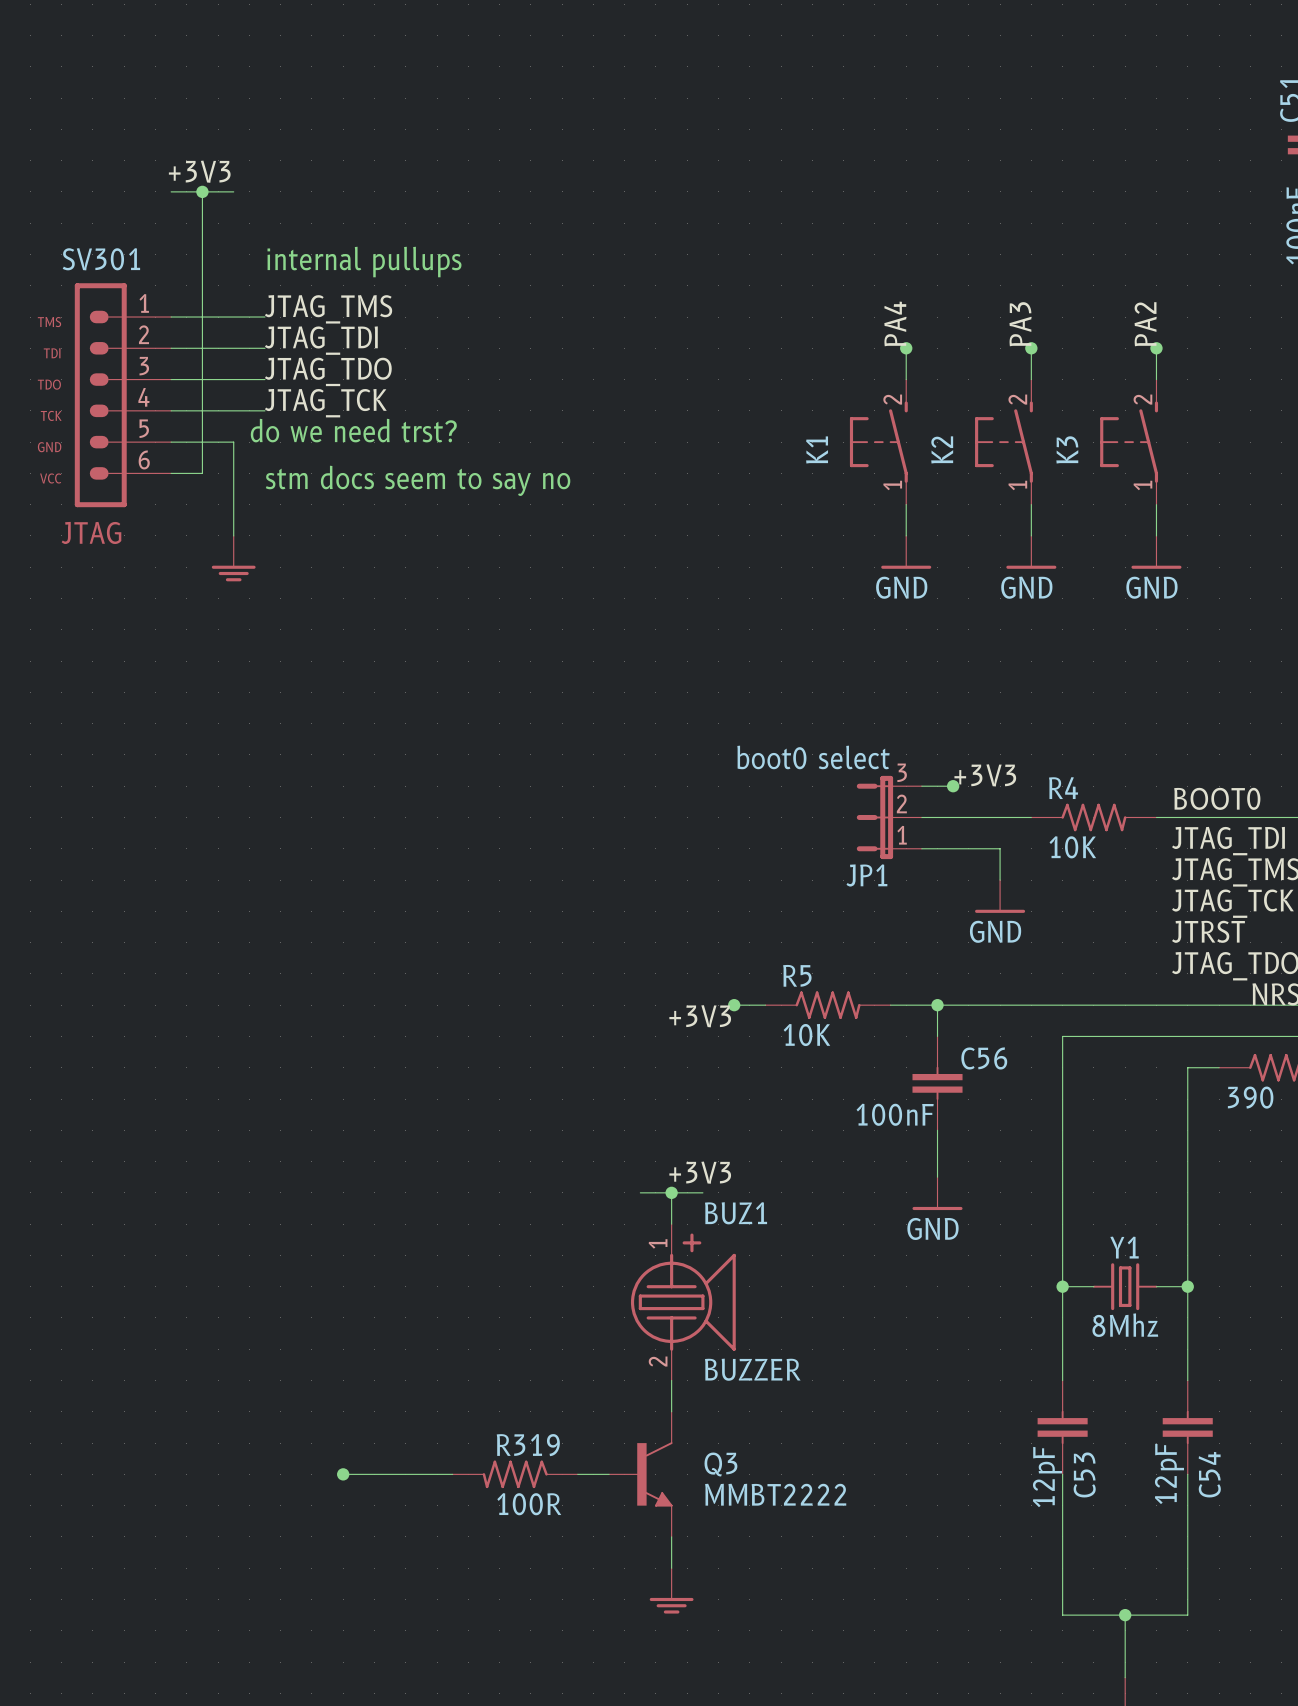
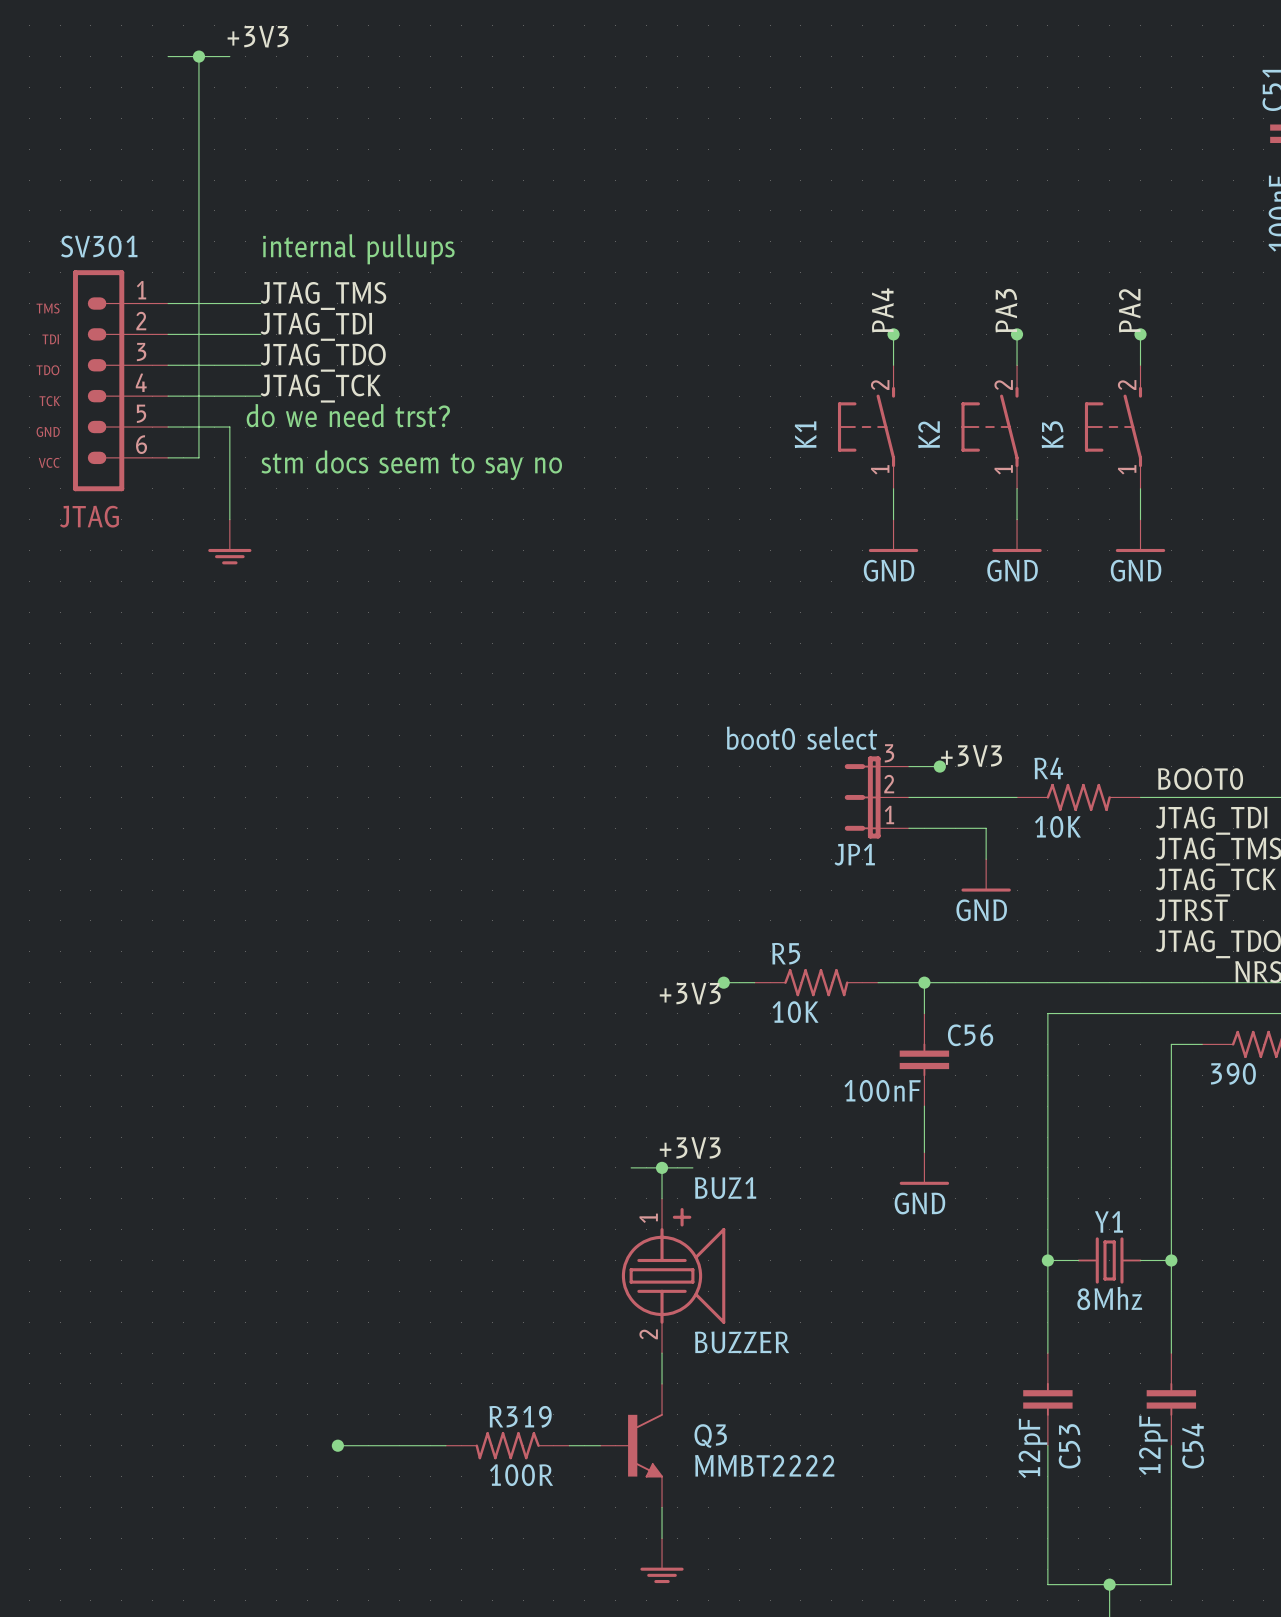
wire: none -> (198, 56) (198, 180)
junction: none -> (198, 56)
label position: +3V3 (199, 171) -> +3V3 (258, 36)
wire: (171, 191) (233, 191) -> (168, 56) (229, 56)
junction: (202, 191) -> none

